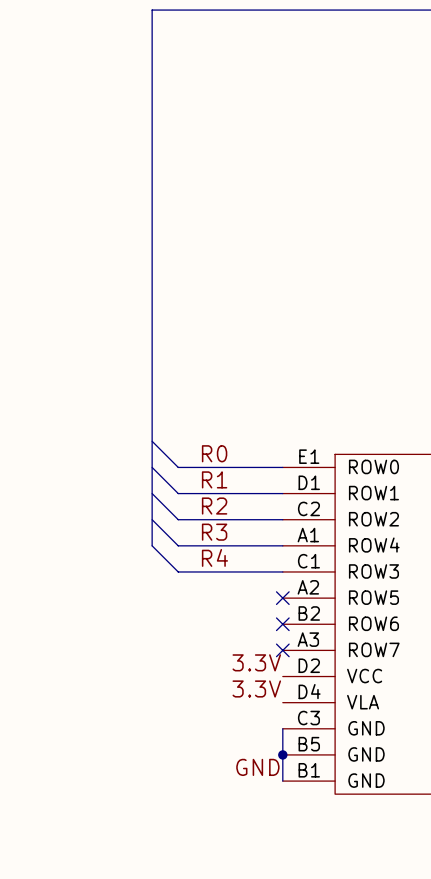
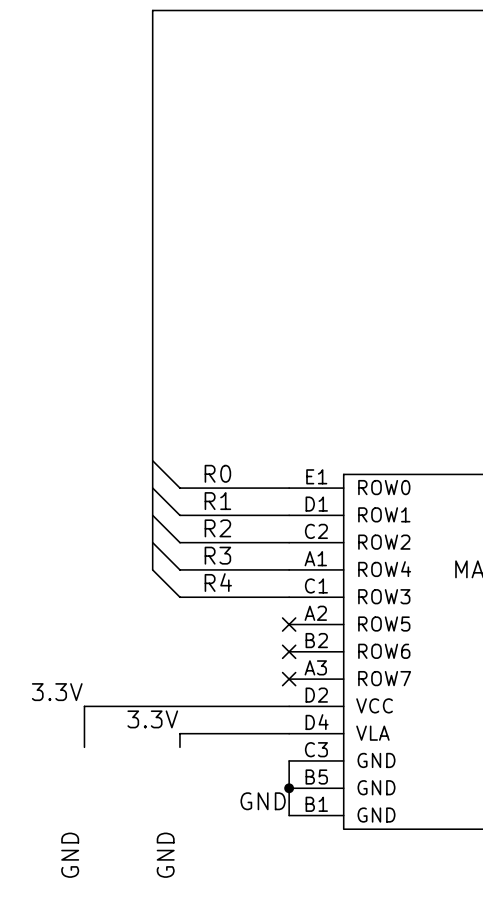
label: none -> 3.3V (57, 692)
label: 3.3V (256, 662) -> none
wire: none -> (289, 706) (84, 706) (84, 747)
label: none -> 3.3V (152, 719)
label: 3.3V (256, 688) -> none
wire: none -> (289, 733) (179, 733) (179, 747)
label: none -> GND (70, 855)
label: none -> GND (165, 855)

